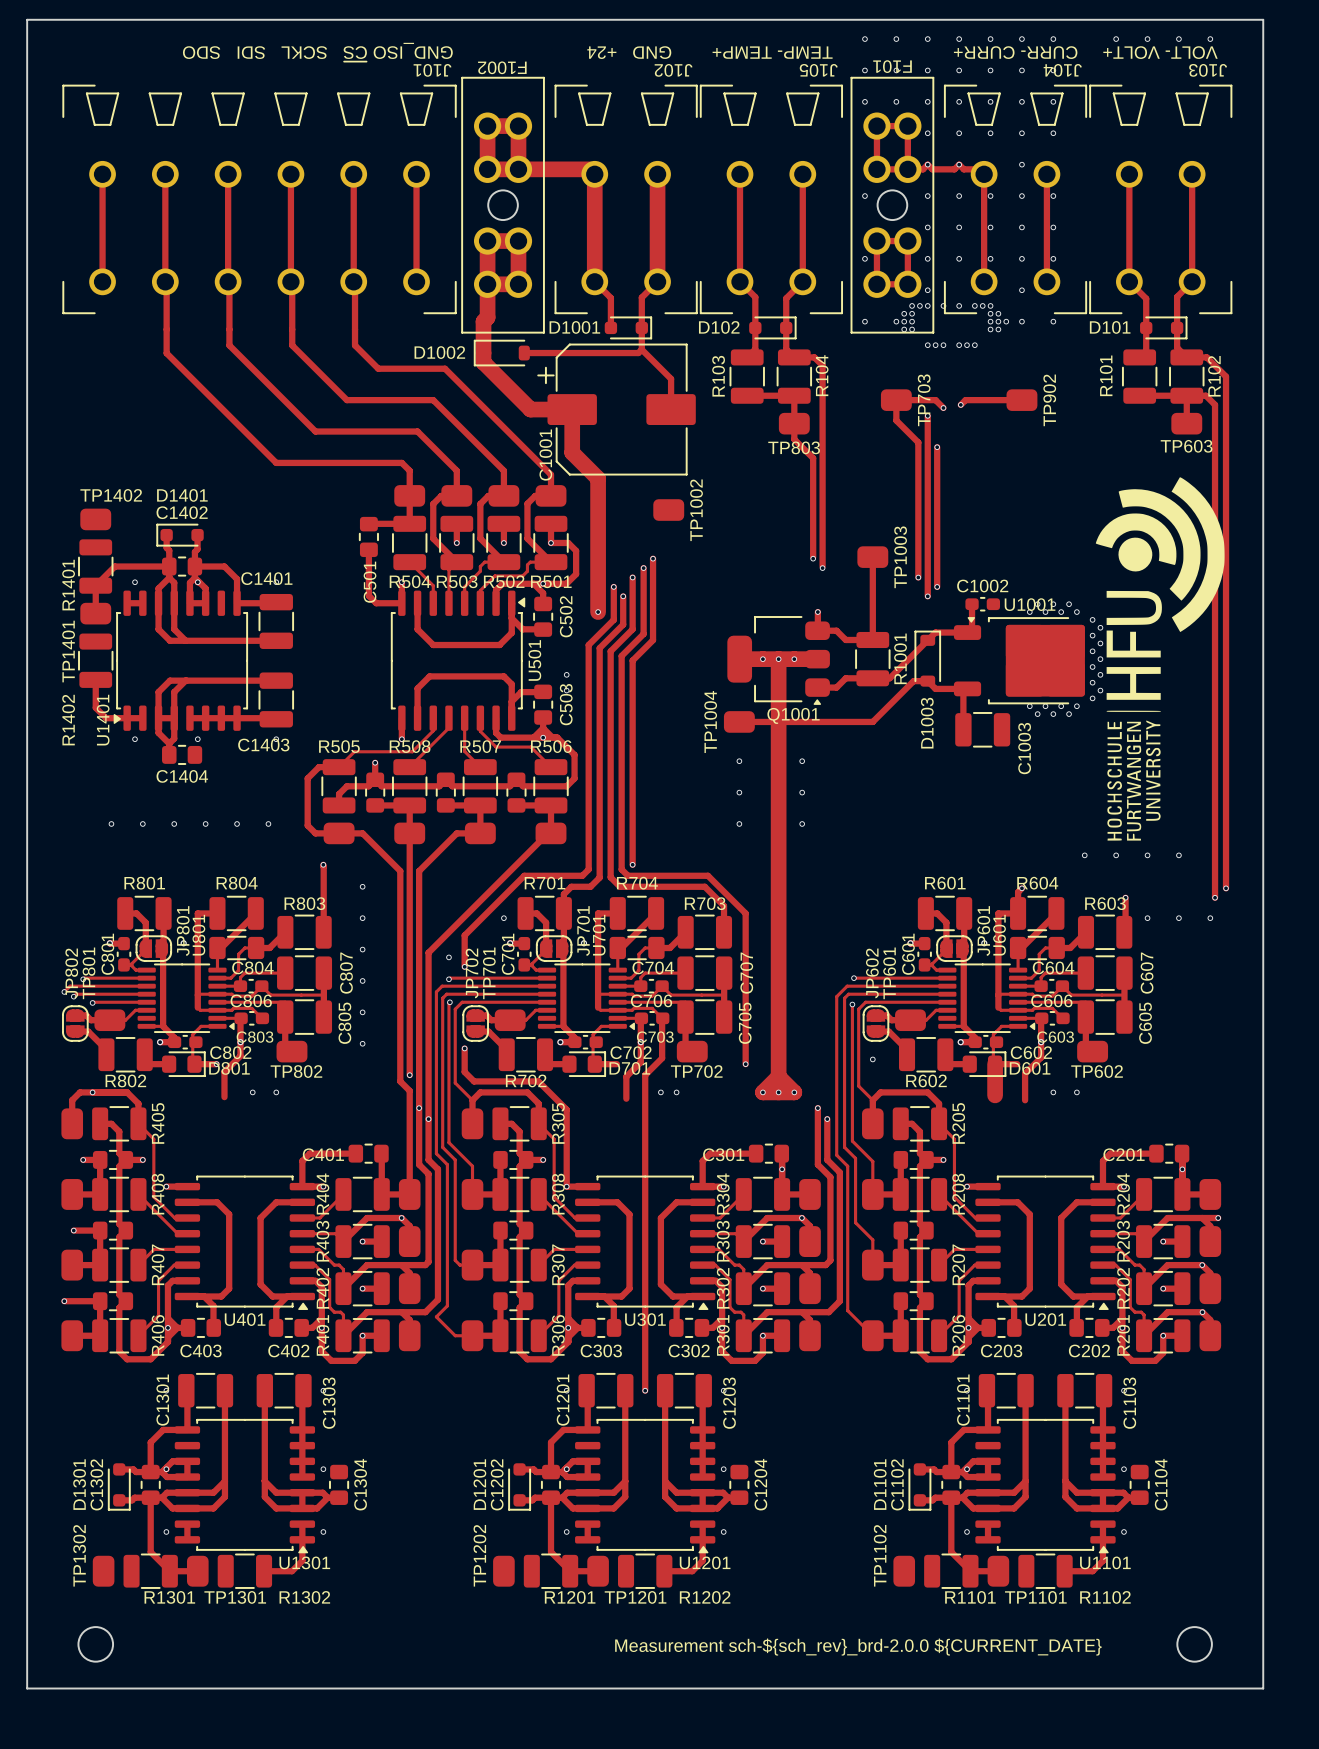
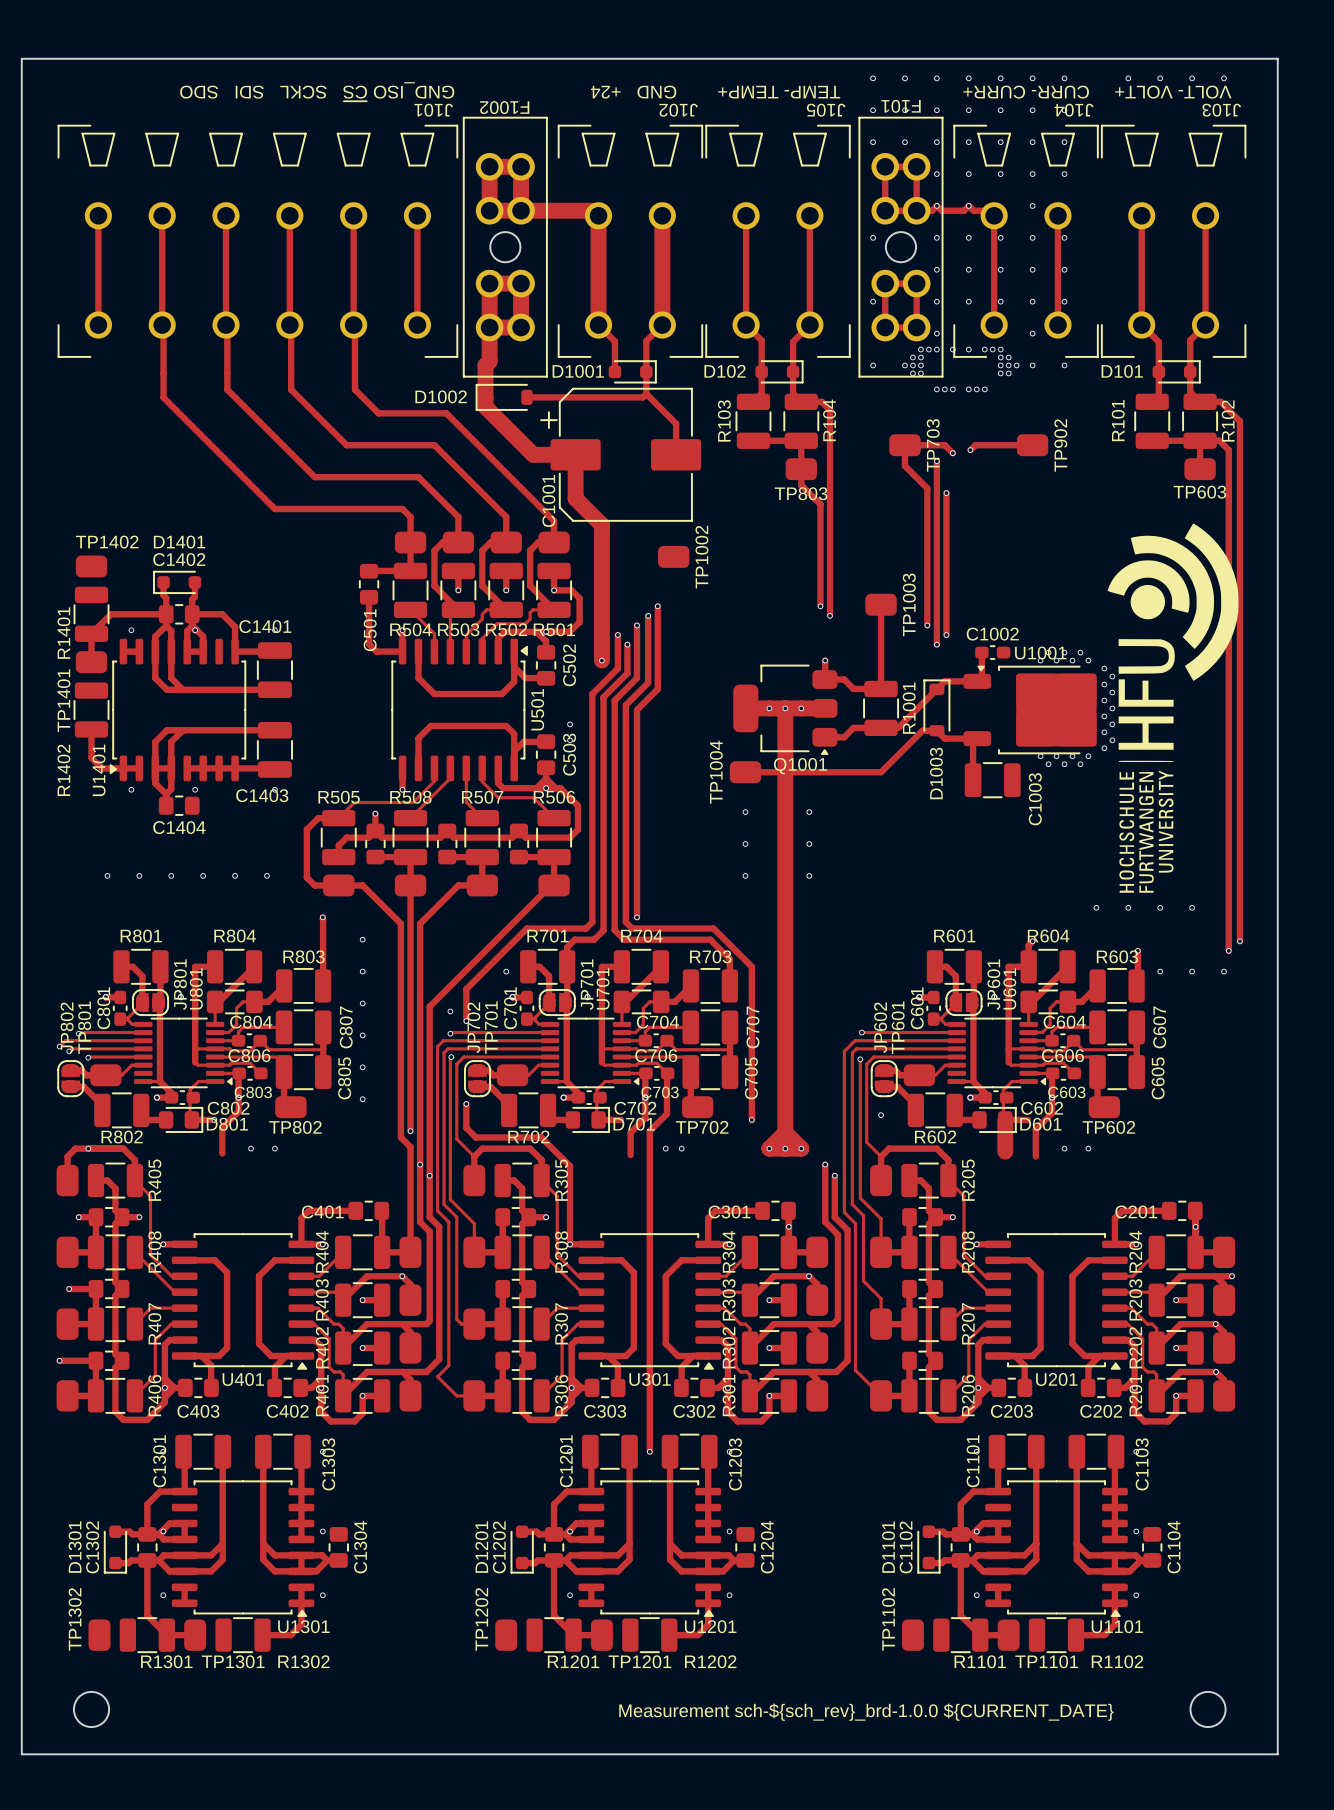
text: Measurement sch-${sch_rev}_brd-2.0.0 ${CURRENT_DATE} (858, 1647) -> Measurement sch-${sch_rev}_brd-1.0.0 ${CURRENT_DATE} (866, 1712)

